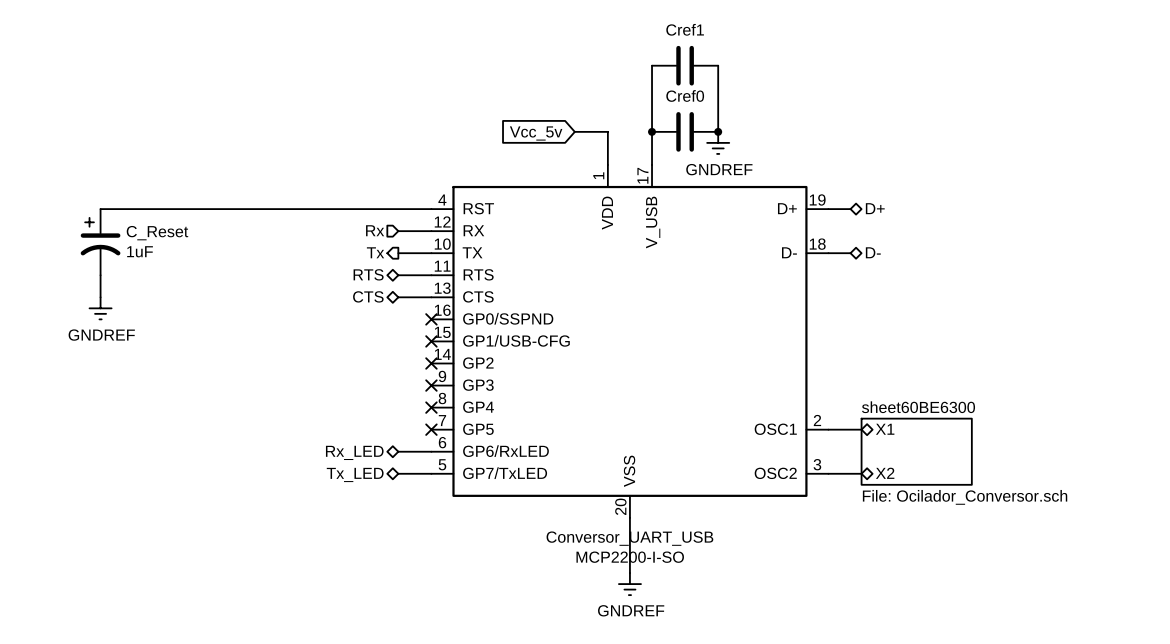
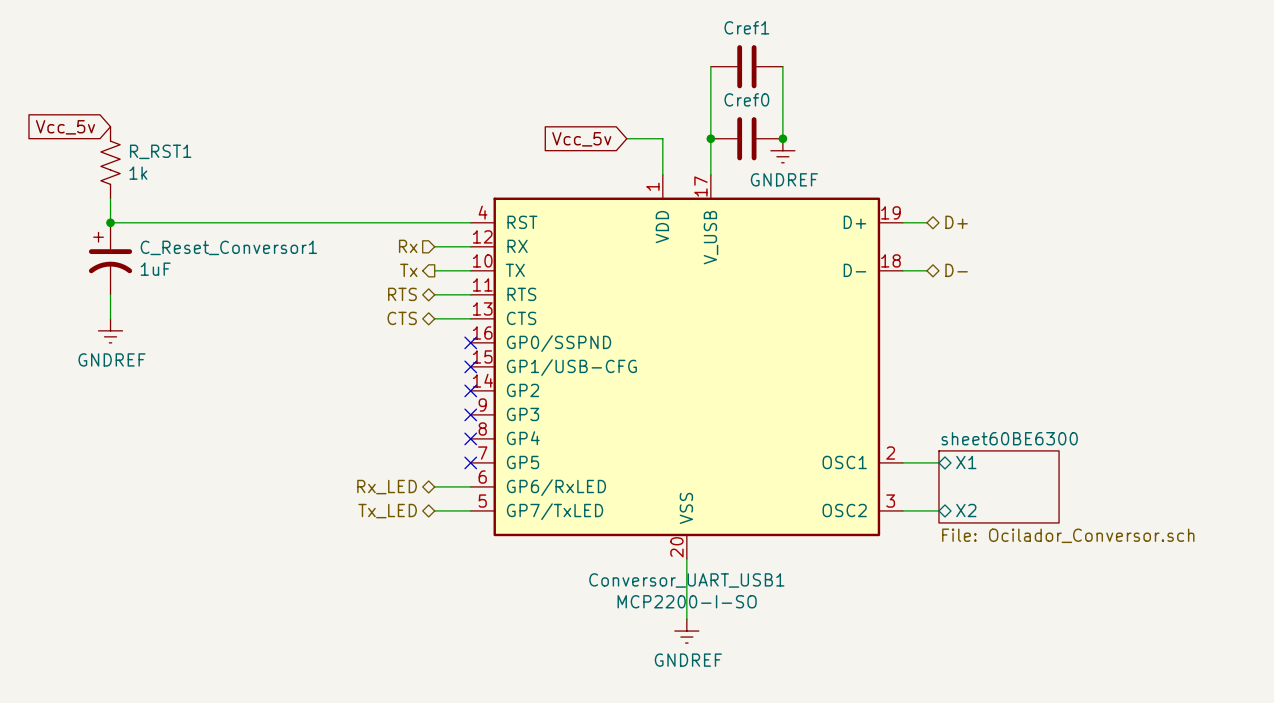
global label: none -> Vcc_5v (65, 127)
R_RST1: none -> 1k (110, 162)
wire: none -> (110, 198) (110, 222)
junction: none -> (110, 222)
C_Reset name: C_Reset (157, 233) -> C_Reset_Conversor1 (228, 247)
Conversor_UART_USB name: Conversor_UART_USB (629, 538) -> Conversor_UART_USB1 (686, 580)

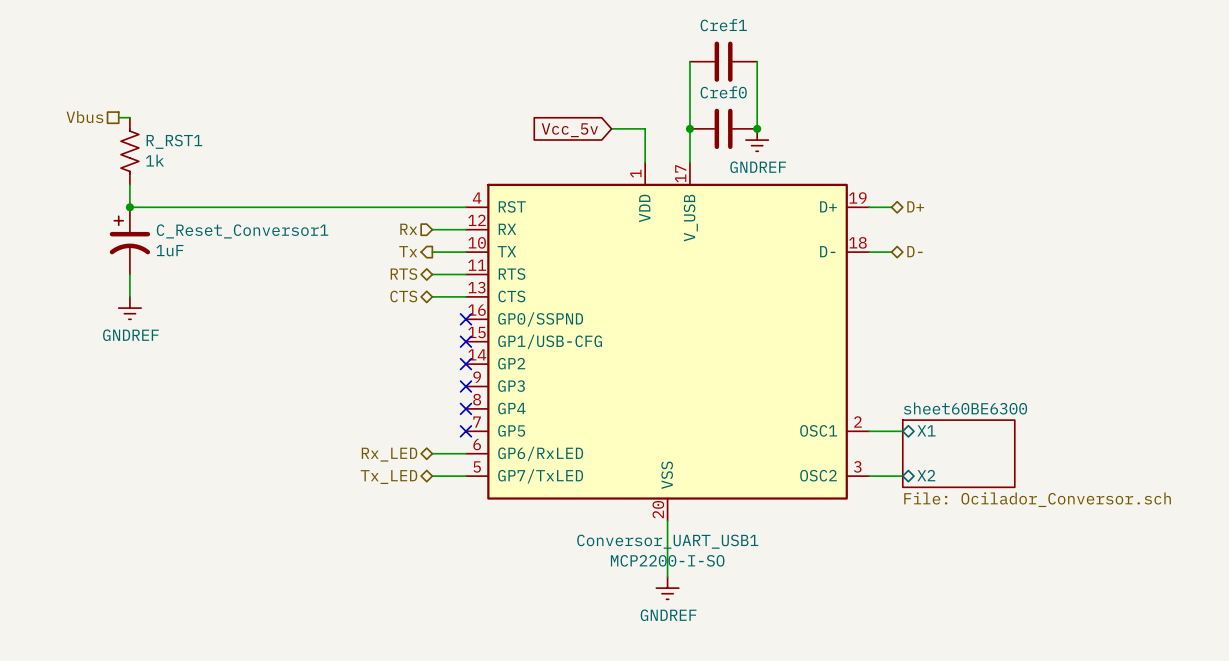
hierarchical label: none -> Vbus (84, 117)
wire: none -> (118, 117) (129, 117)
global label: Vcc_5v (65, 127) -> none

